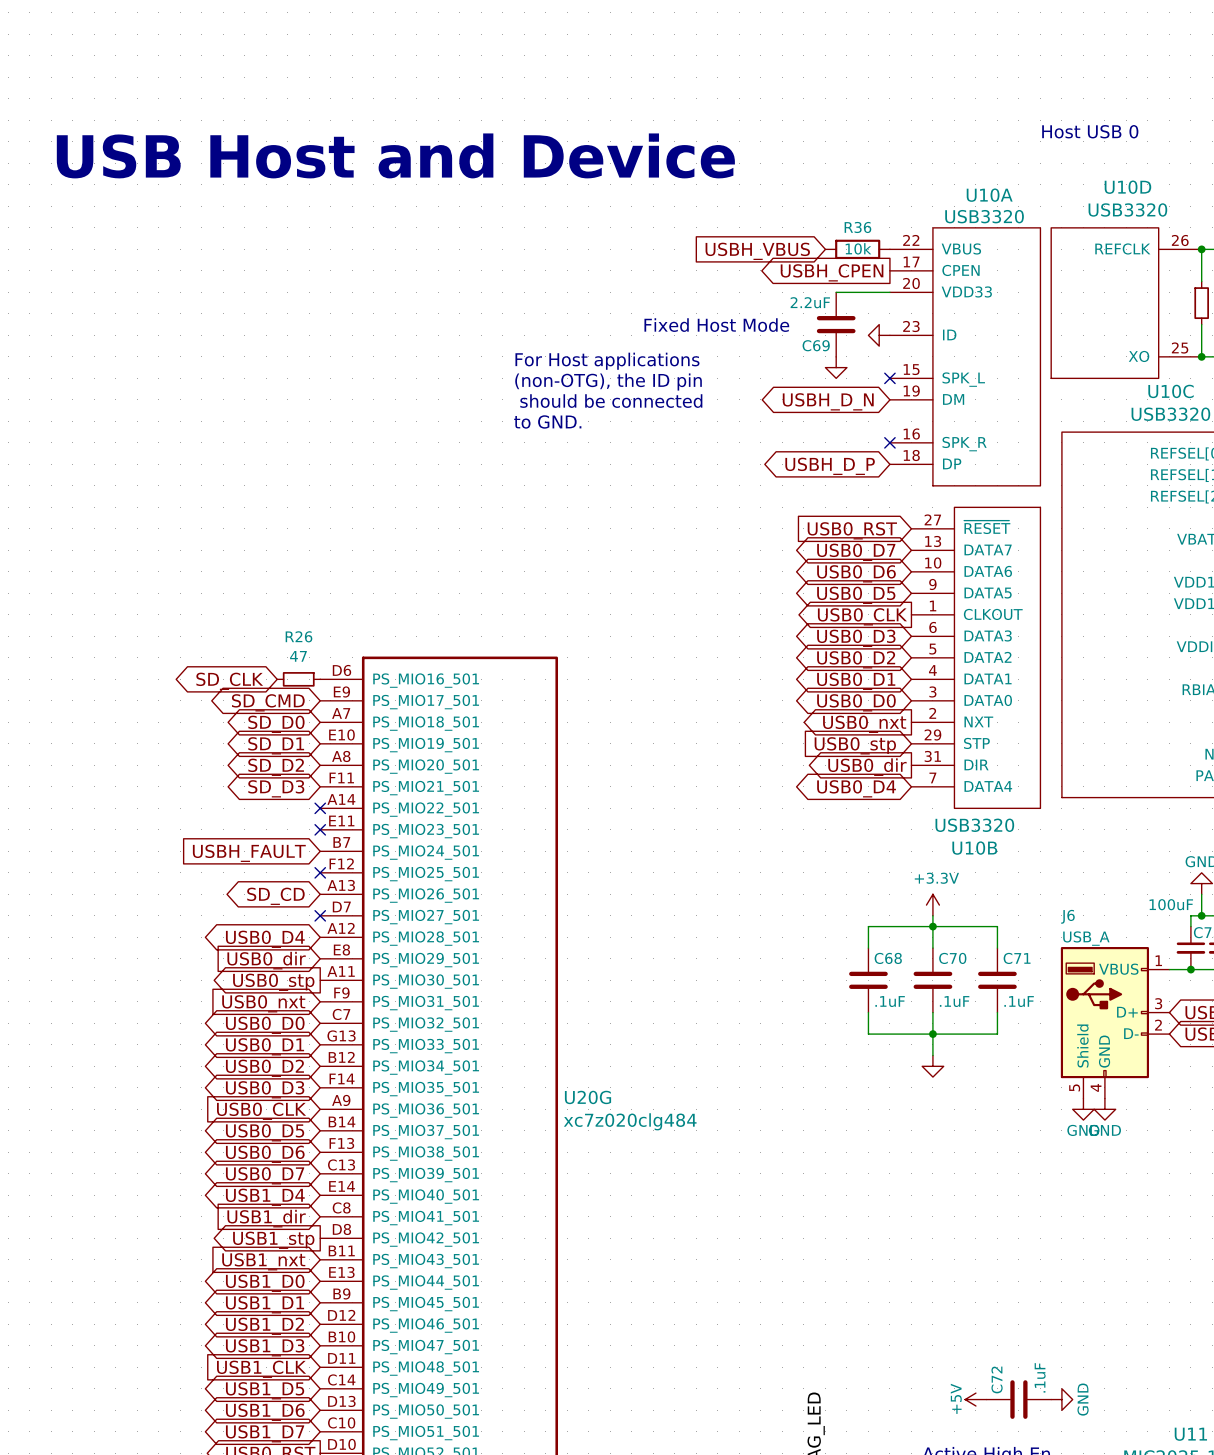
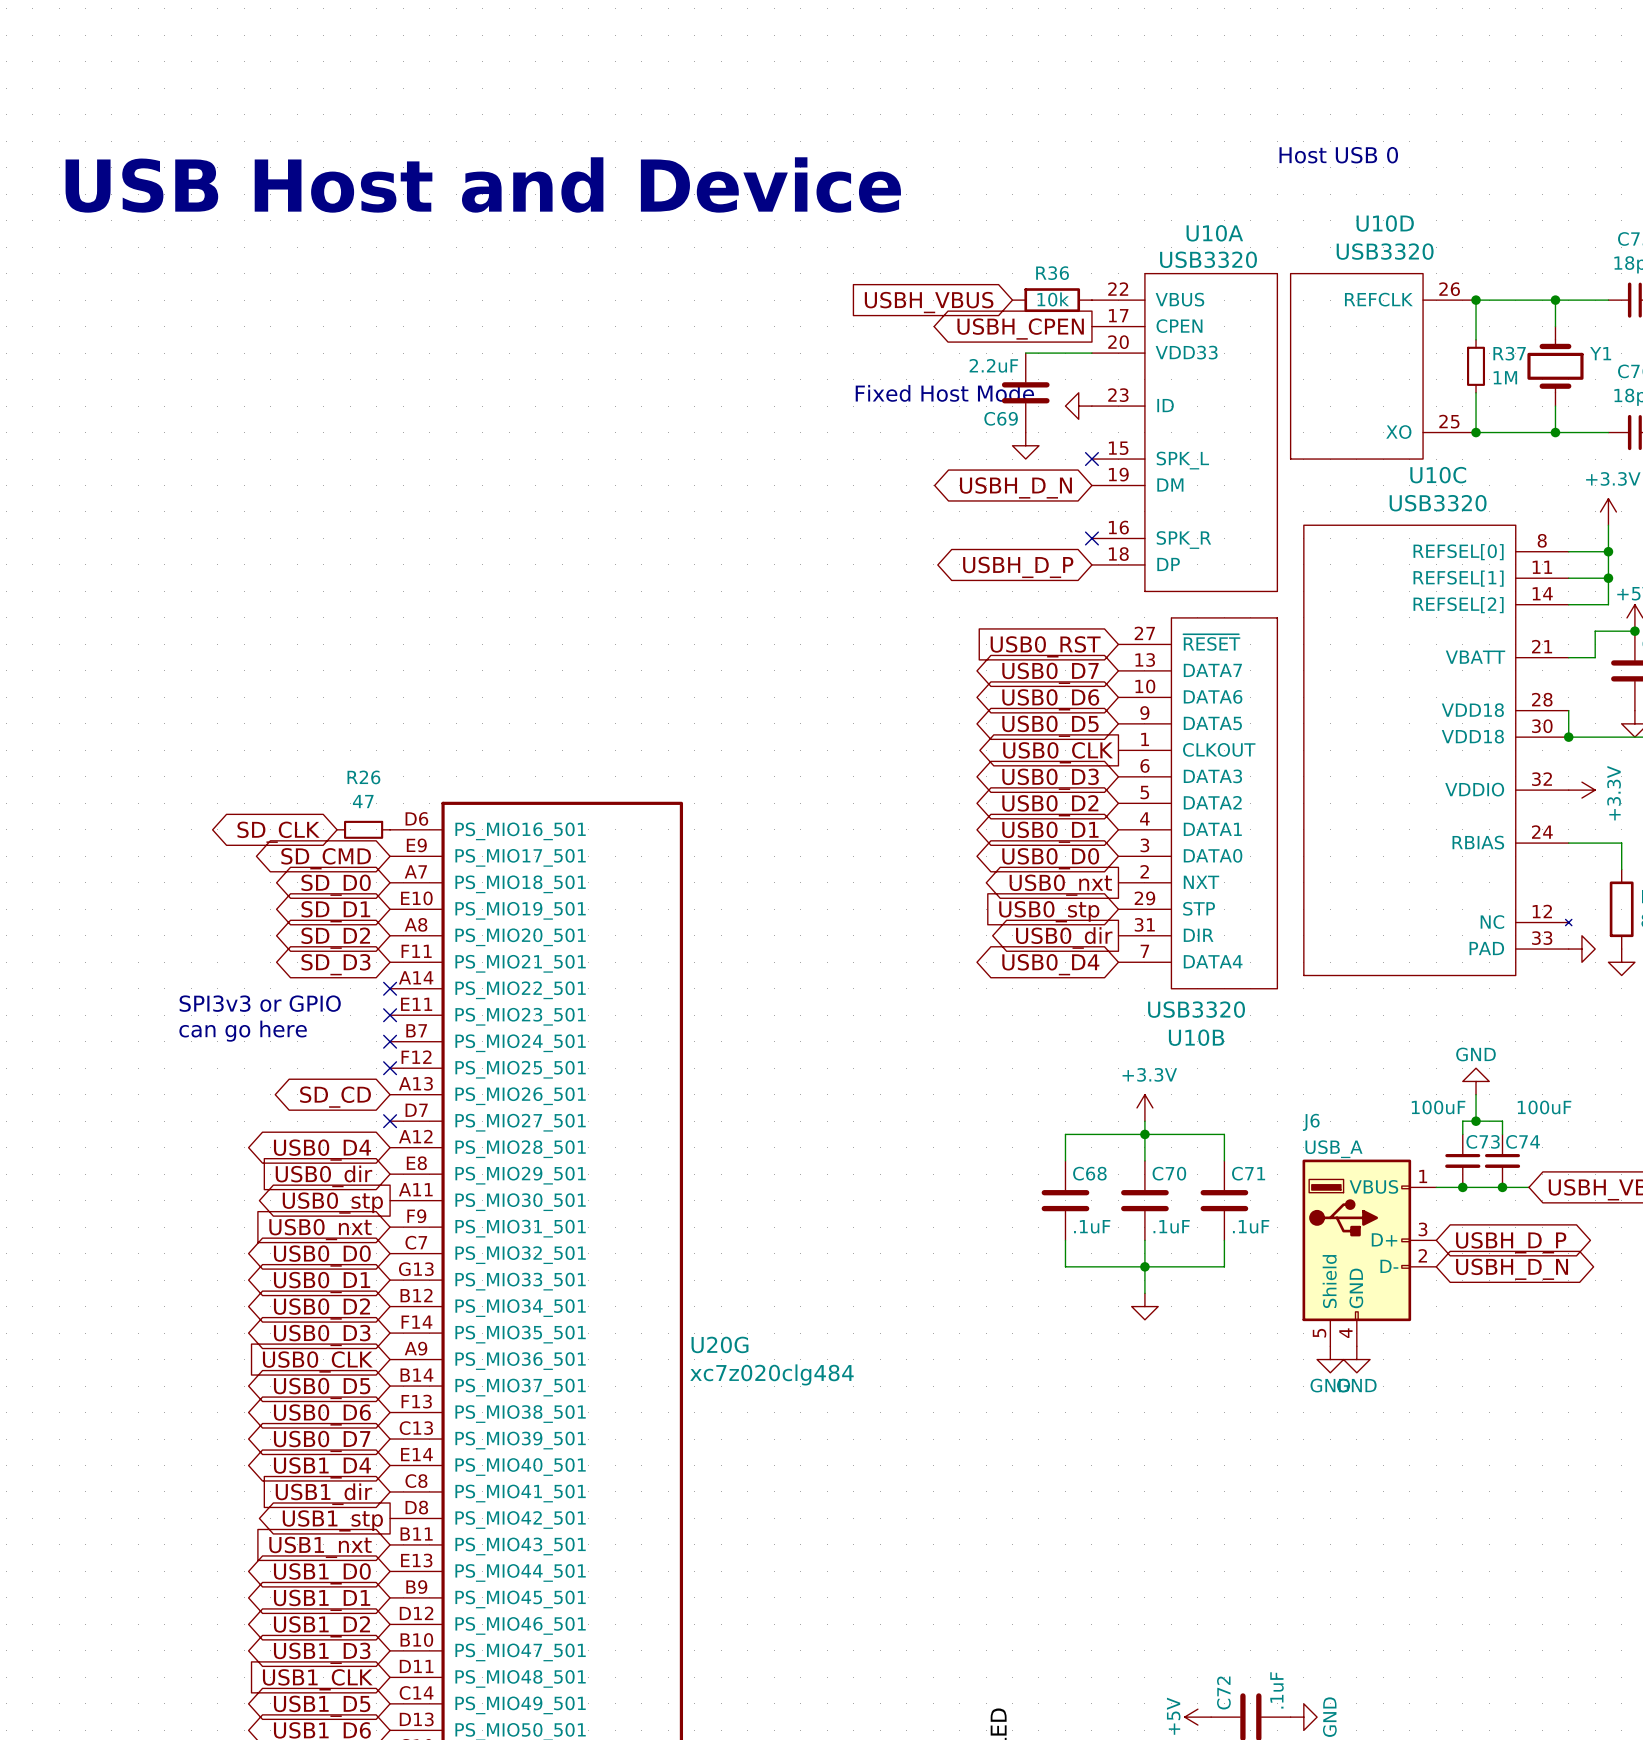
text position: Fixed Host Mode (716, 325) -> Fixed Host Mode (944, 393)
text: For Host applications (607, 361) -> none
text: (non-OTG), the ID pin (608, 382) -> none
text: should be connected (611, 401) -> none
text: to GND. (547, 421) -> none
text: none -> SPI3v3 or GPIO (260, 1003)
text: none -> can go here (243, 1031)
no-connect mark: none -> (390, 1041)
global label: USBH_FAULT (249, 853) -> none

